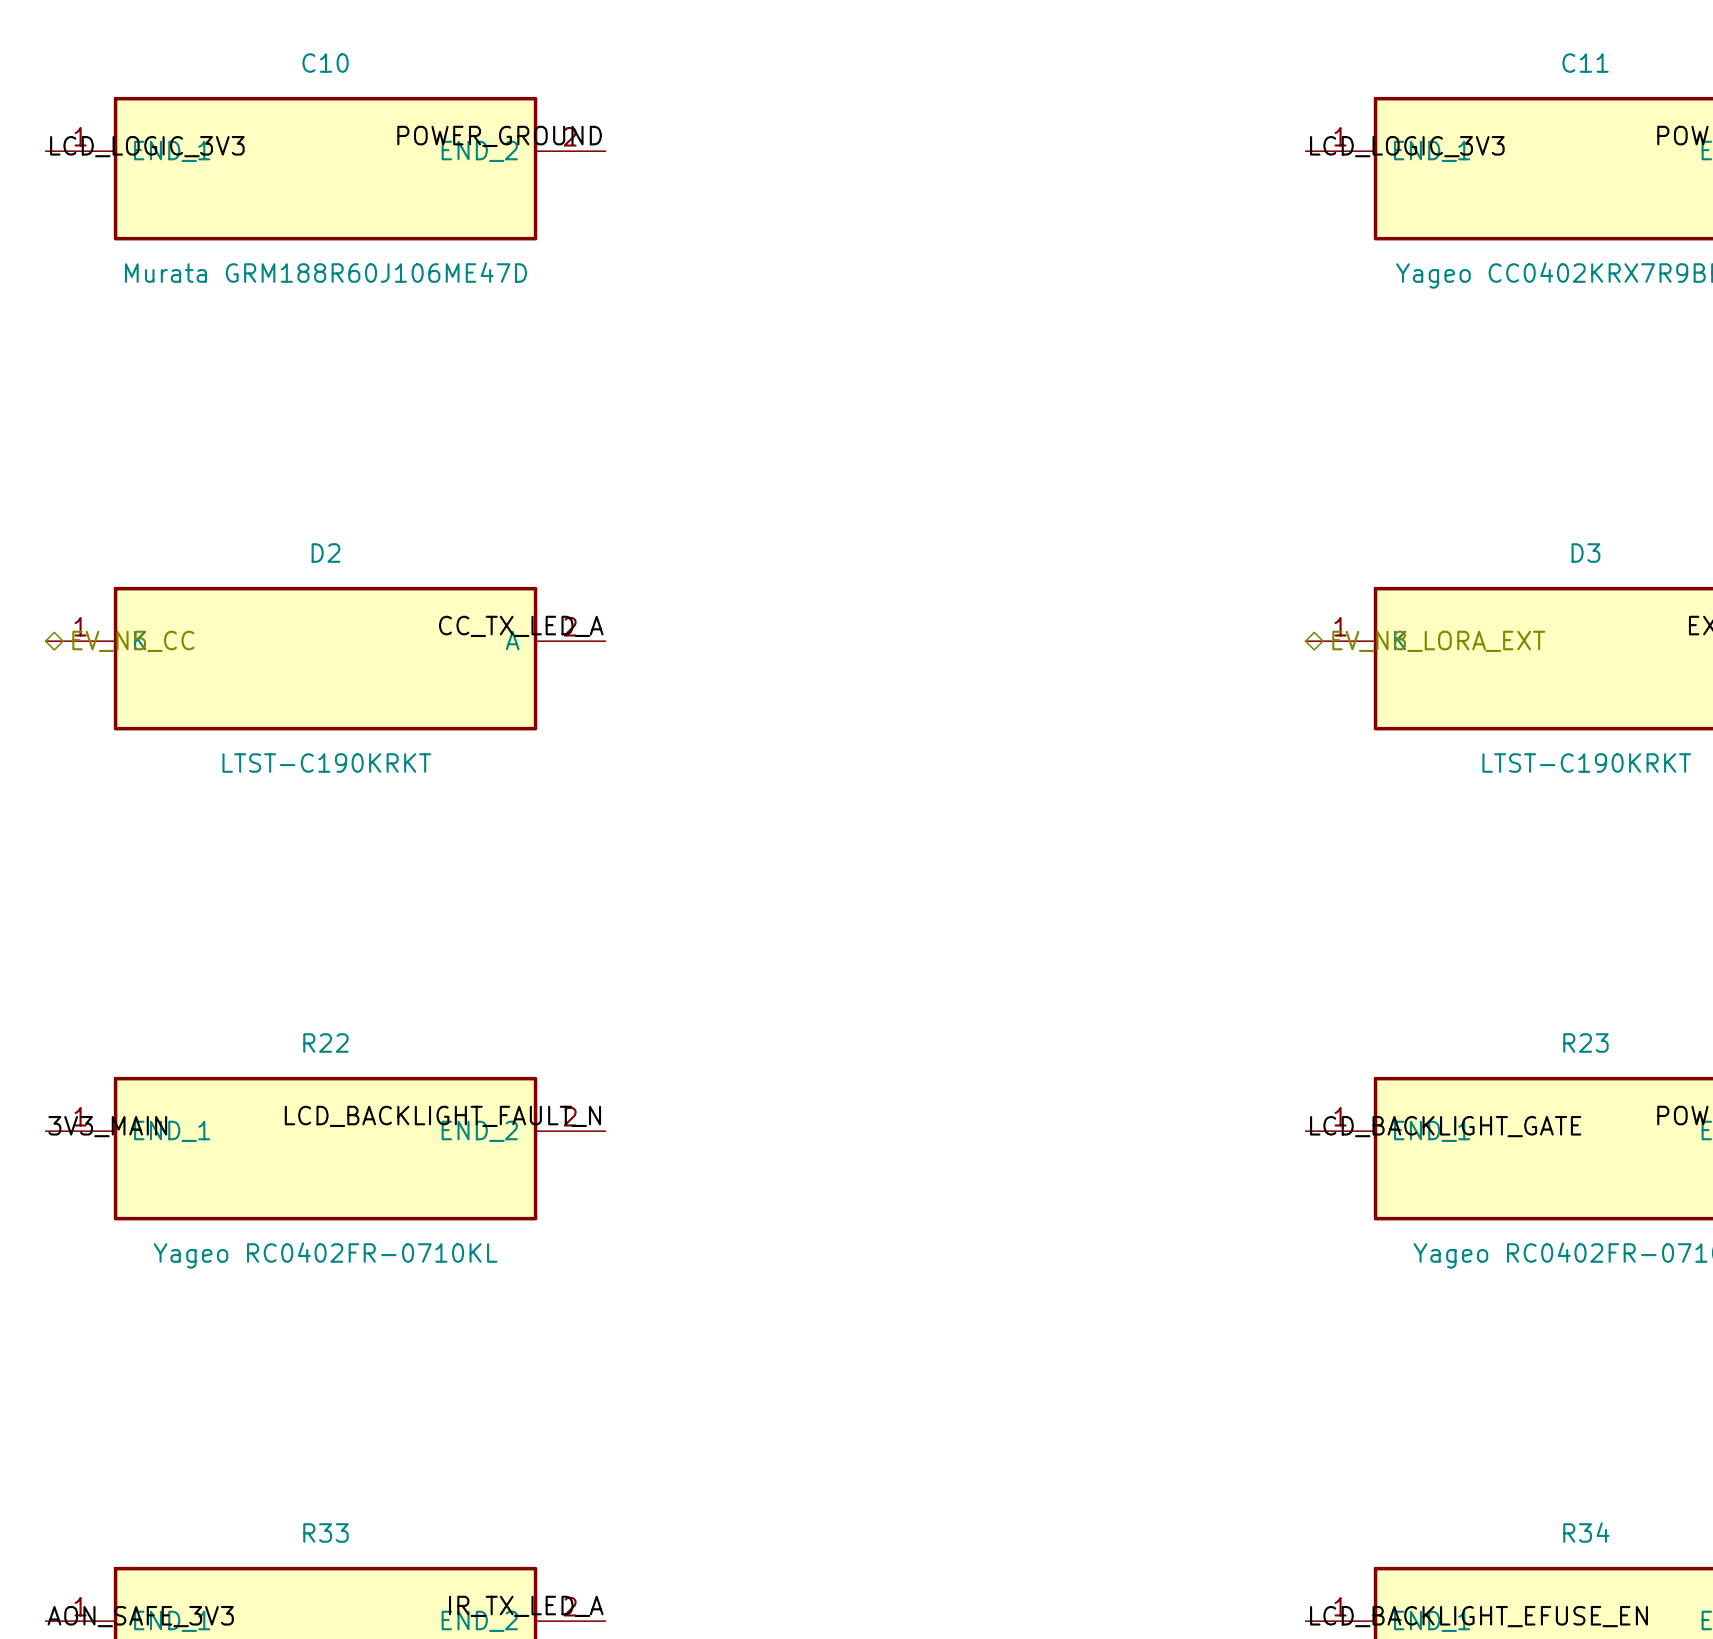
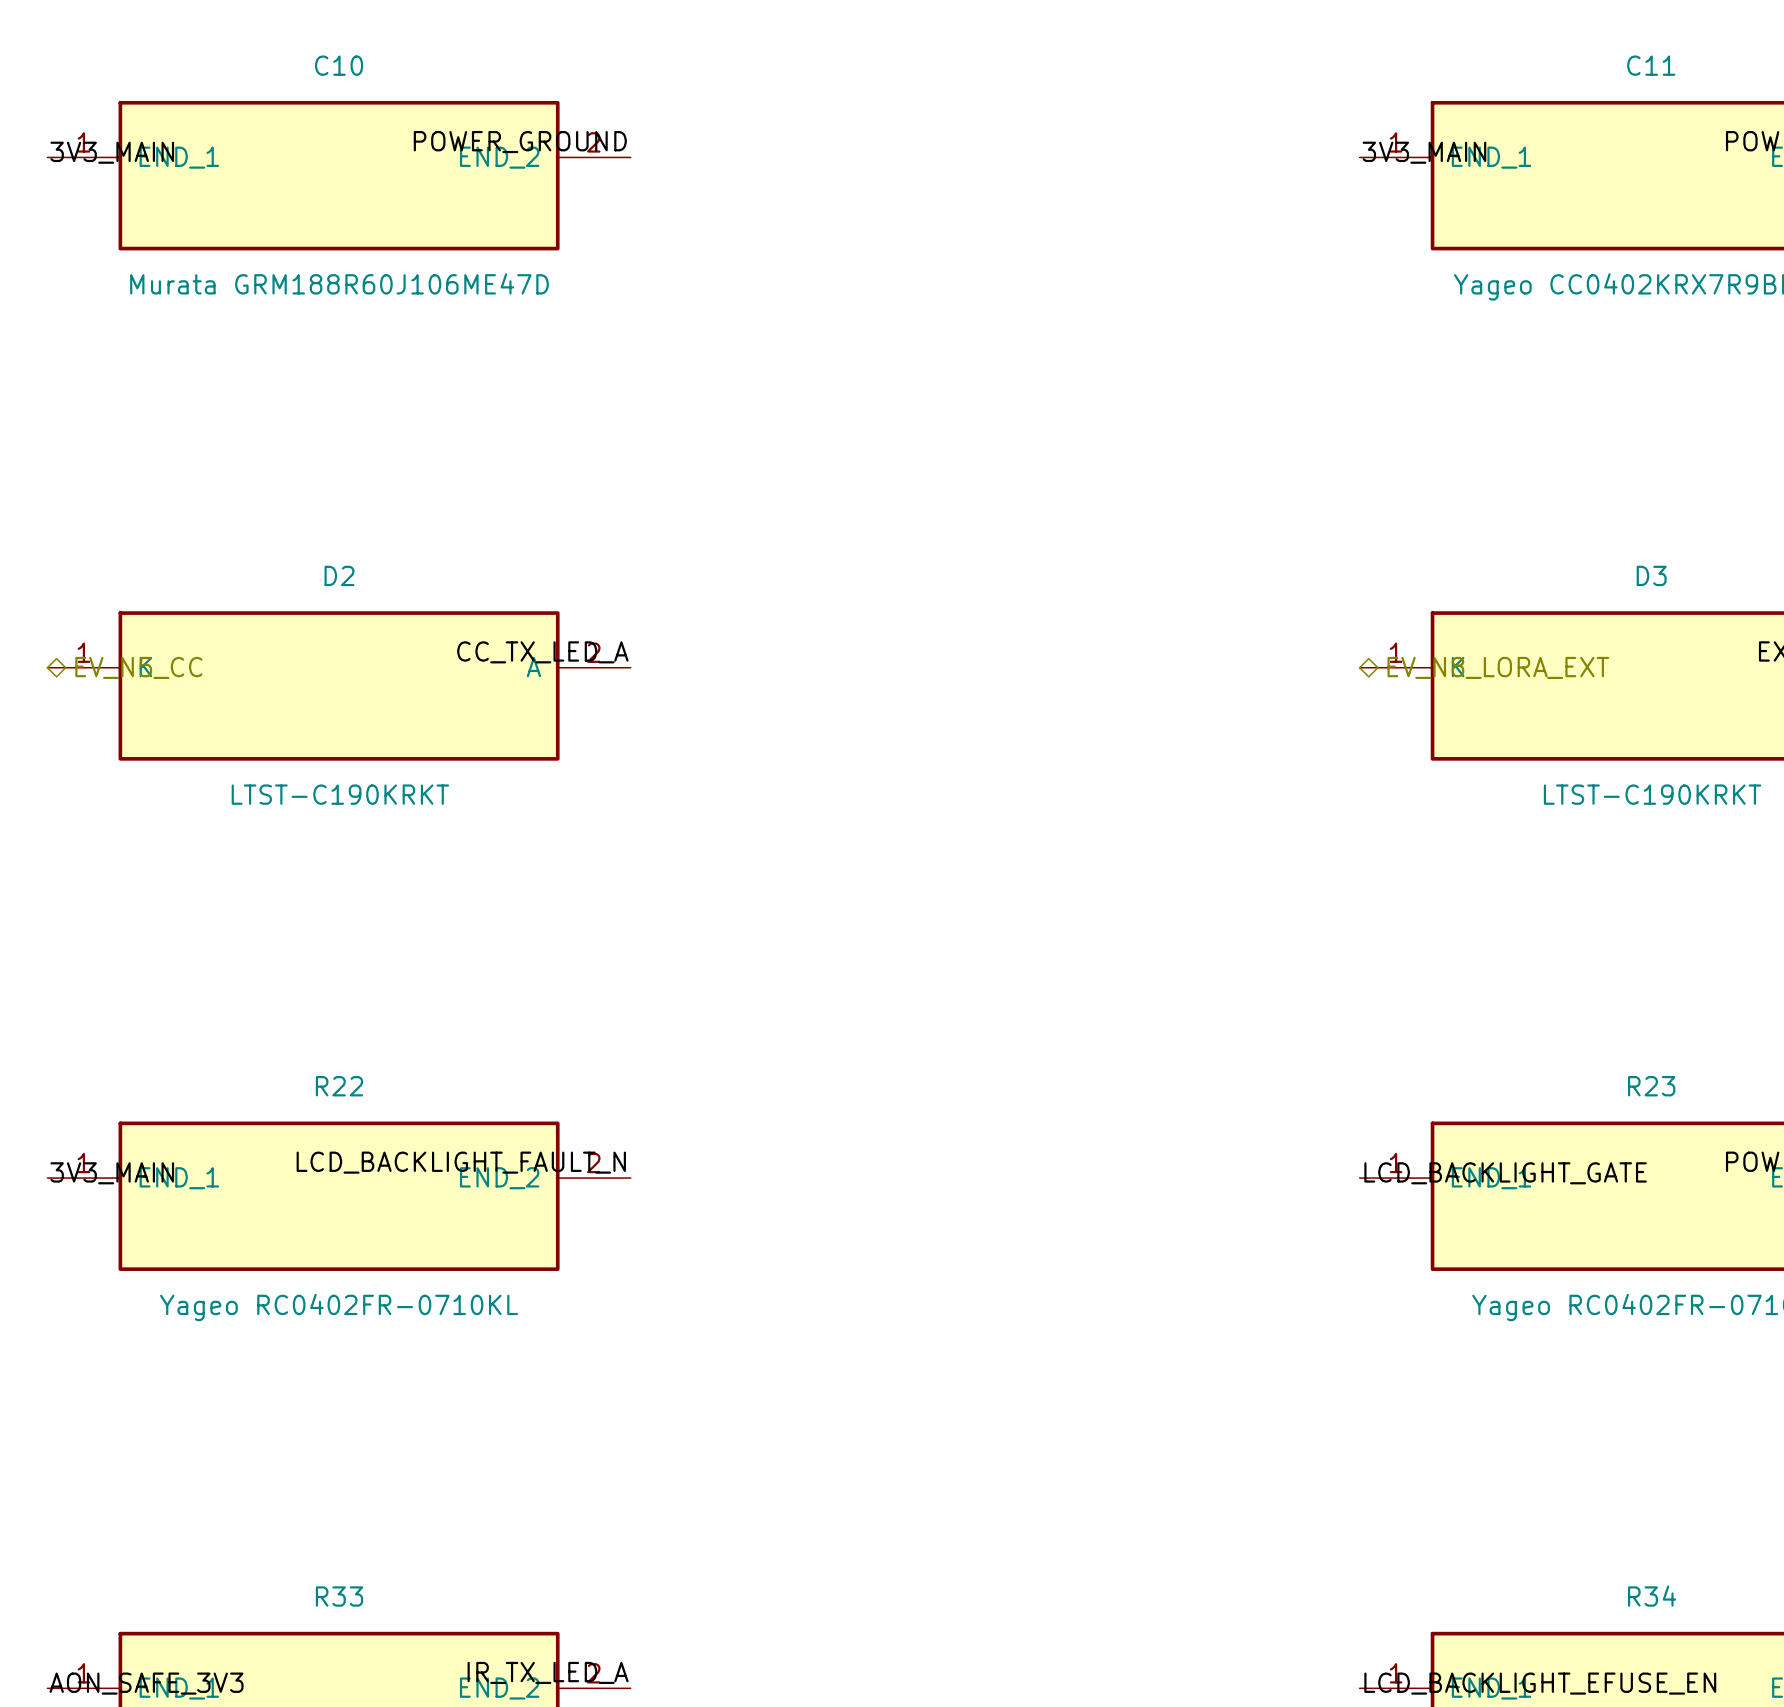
label: LCD_LOGIC_3V3 (147, 146) -> 3V3_MAIN (112, 152)
label: LCD_LOGIC_3V3 (1407, 146) -> 3V3_MAIN (1424, 152)

